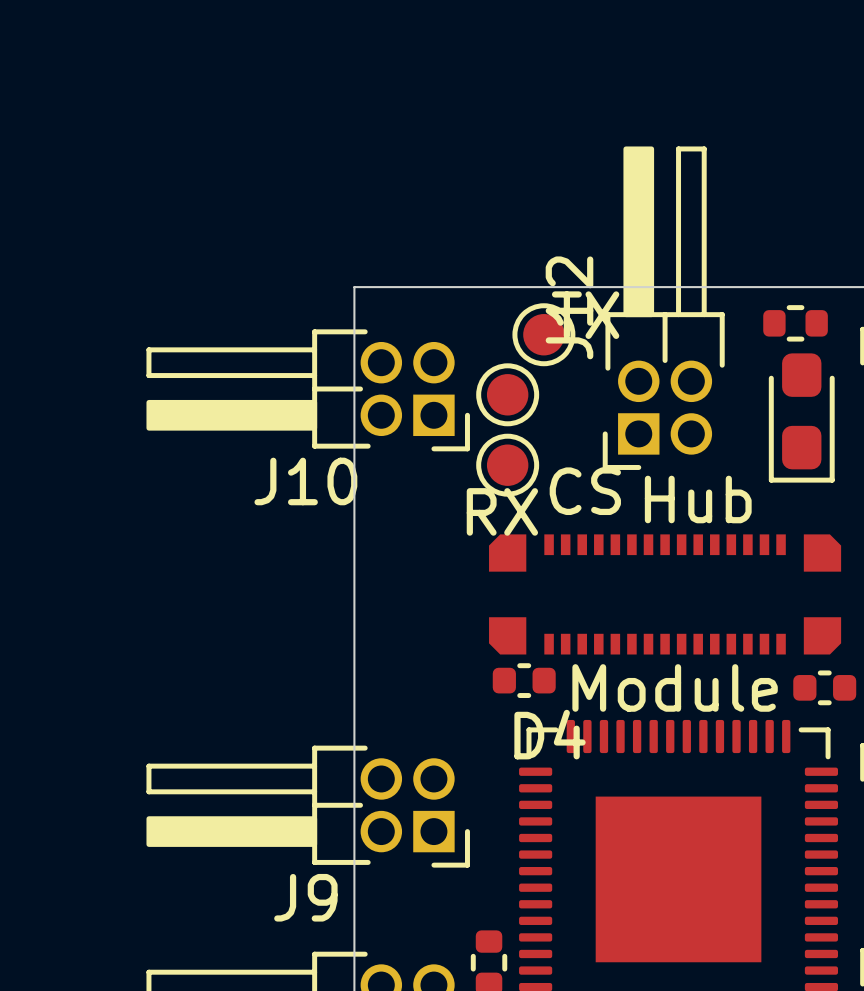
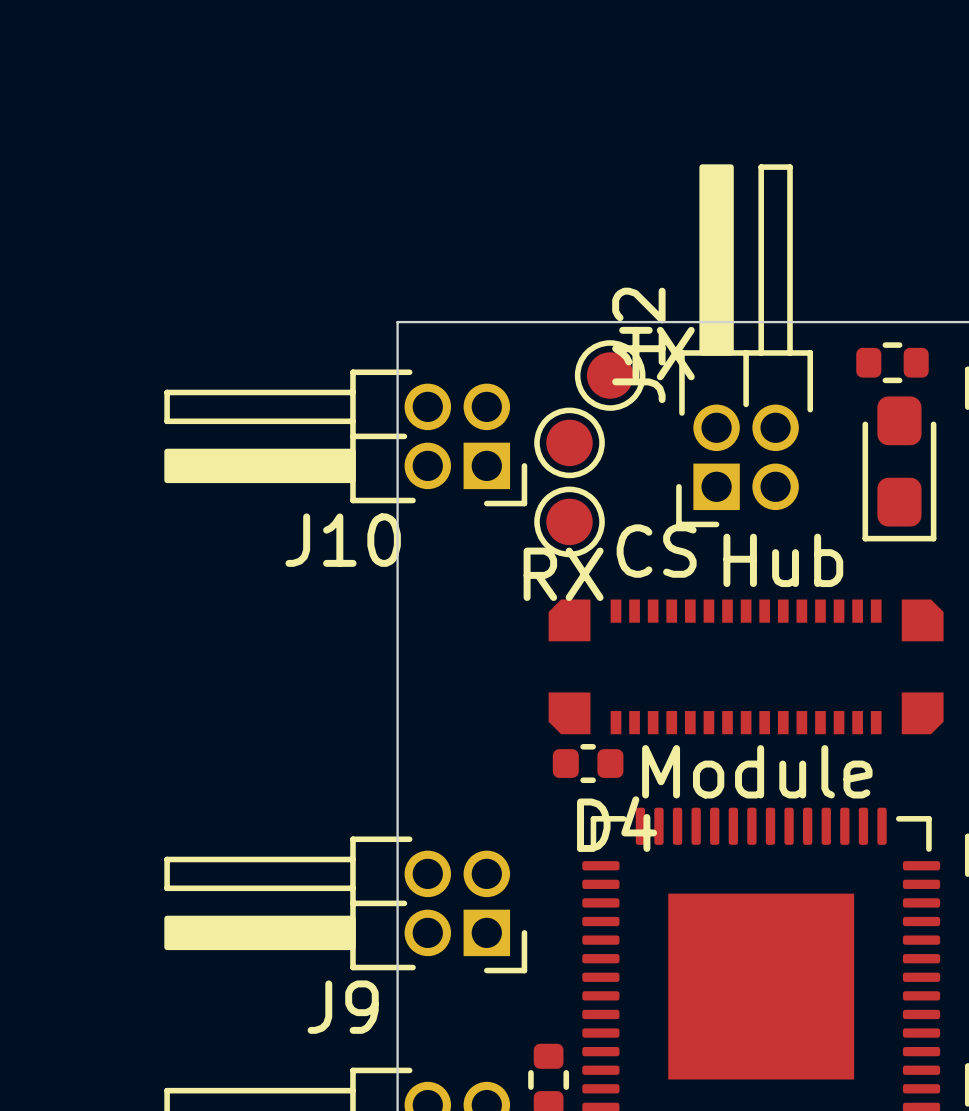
part: (824, 687) -> none

